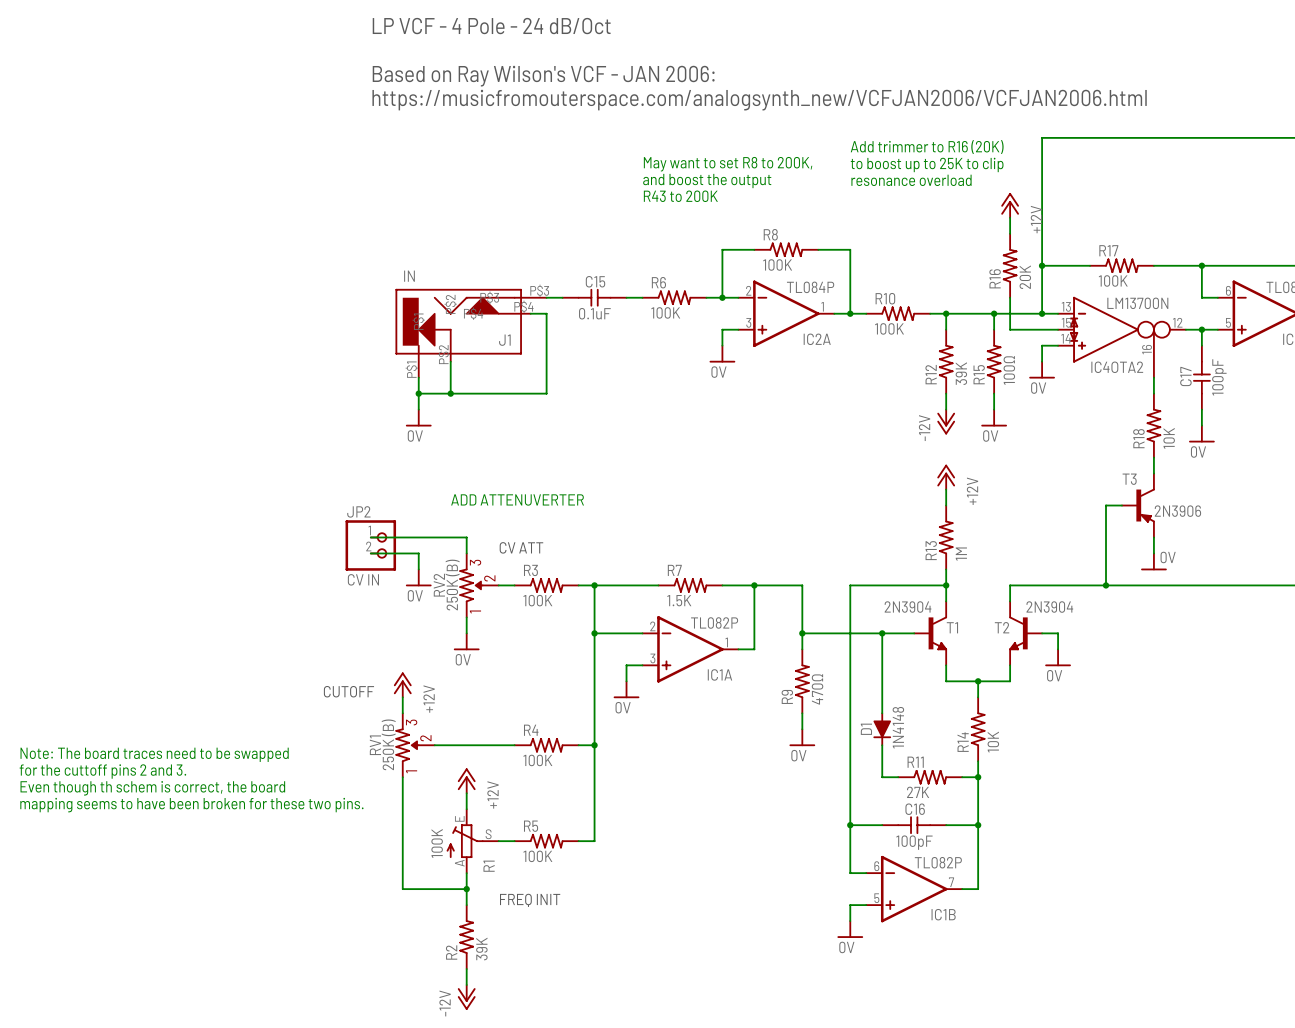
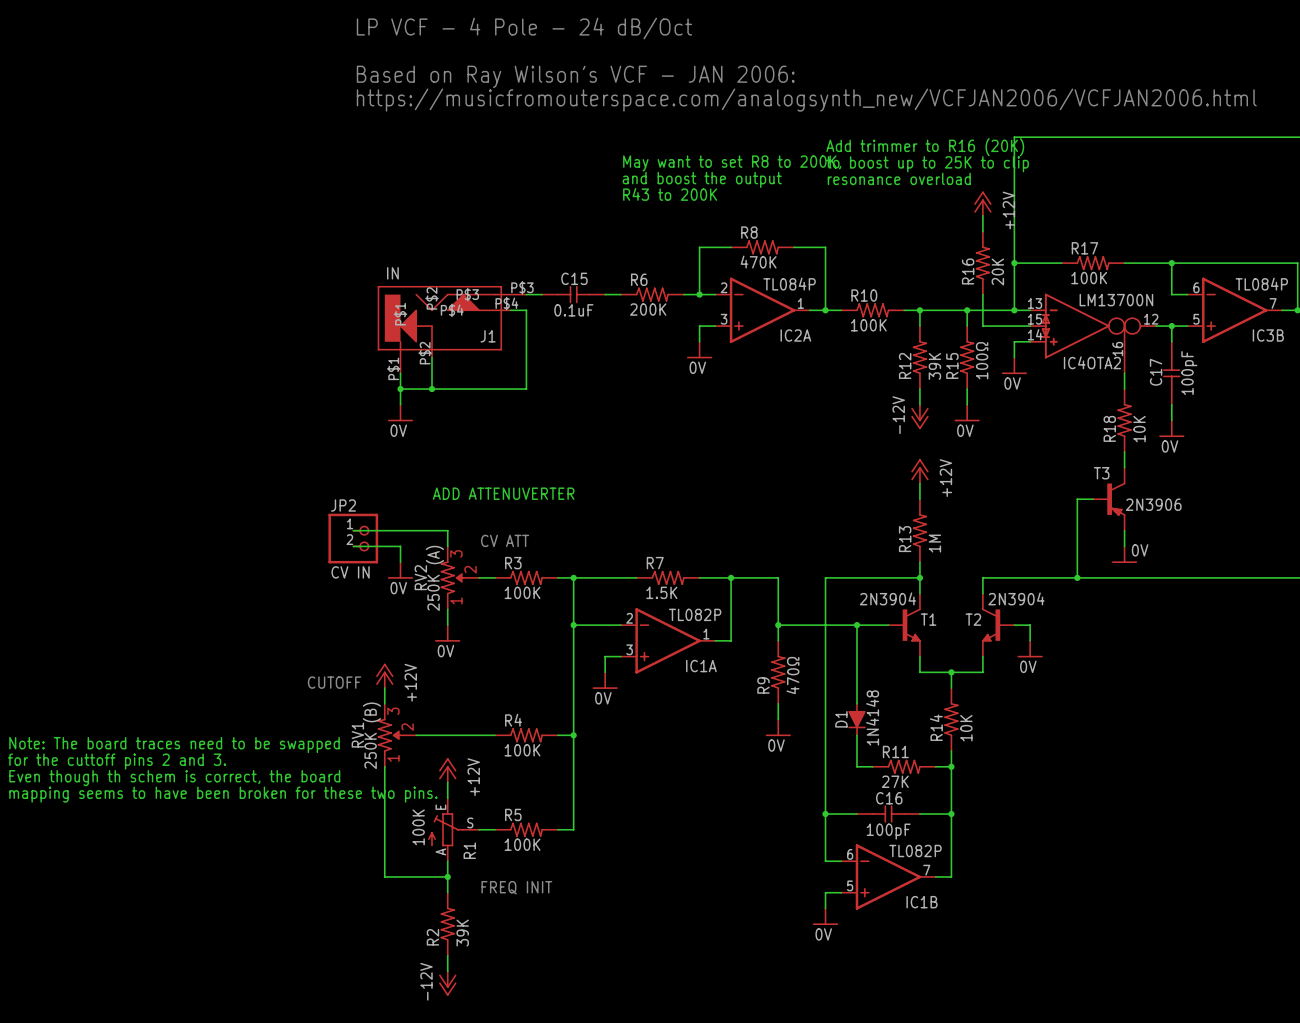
R8 value: 100K (777, 264) -> 470K (758, 262)
R6 value: 100K (665, 312) -> 200K (648, 309)
RV2 value: 250K (B) (452, 584) -> 250K (A) (434, 578)

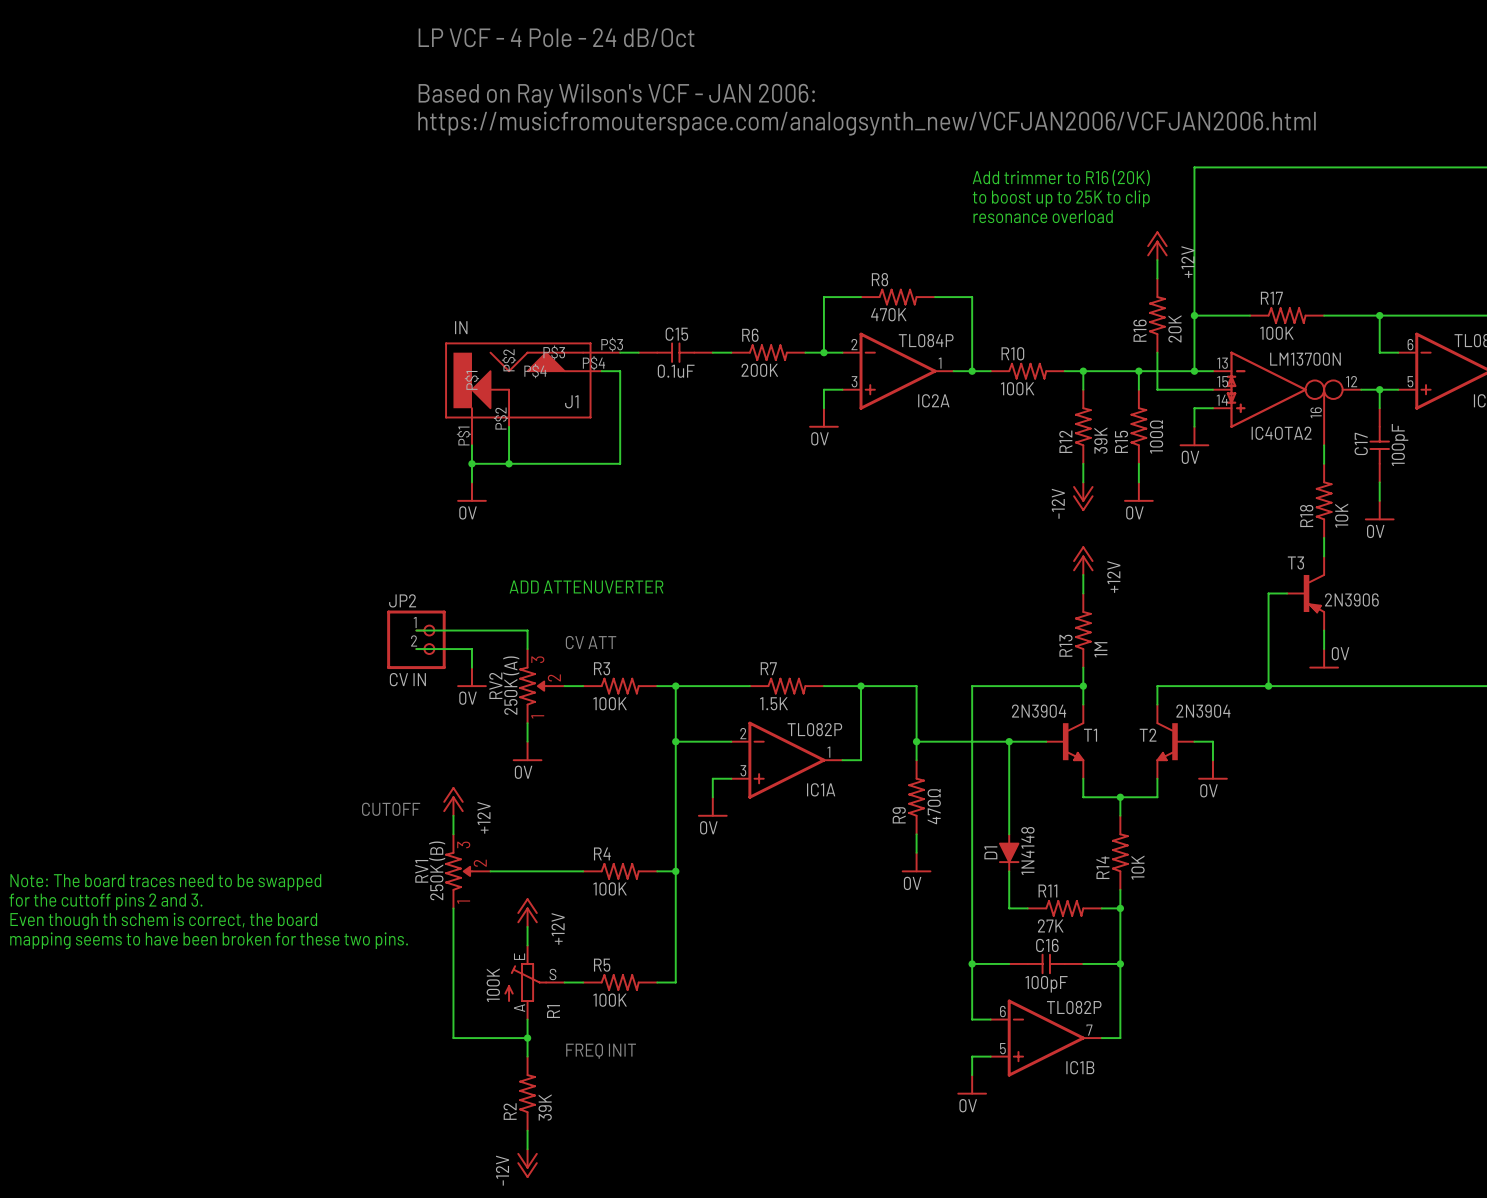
text: May want to set R8 to 200K, (732, 163) -> none
text: and boost the output (702, 179) -> none
text: R43 to 200K (670, 194) -> none

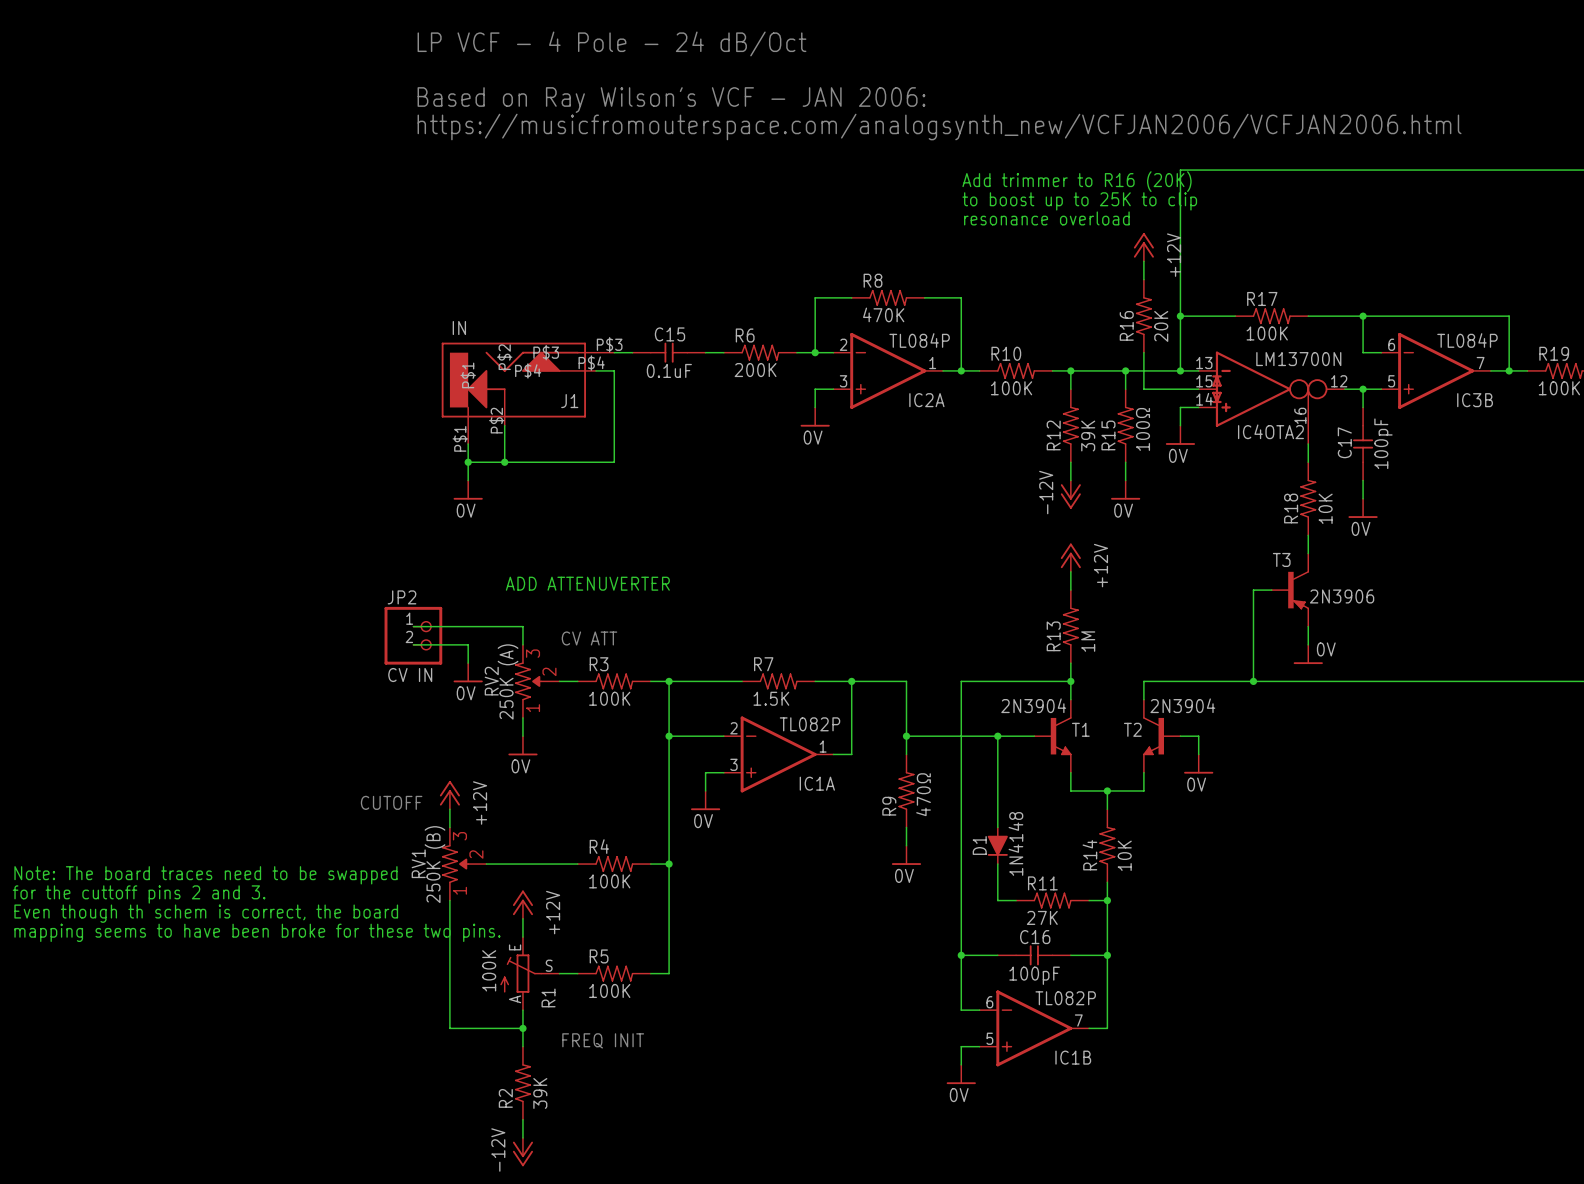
text: mapping seems to have been broken for these two pins. (209, 940) -> mapping seems to have been broke for these two pins. (257, 932)

